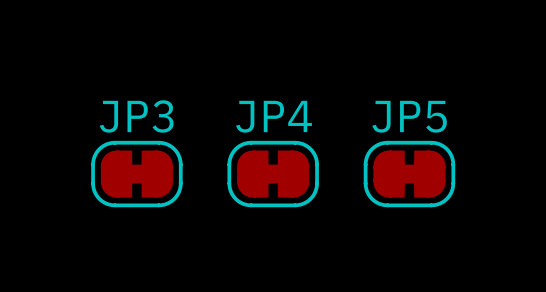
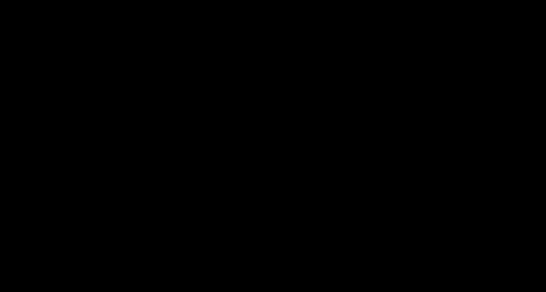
JP3: (136, 174) -> none
JP4: (273, 174) -> none
JP5: (409, 174) -> none

